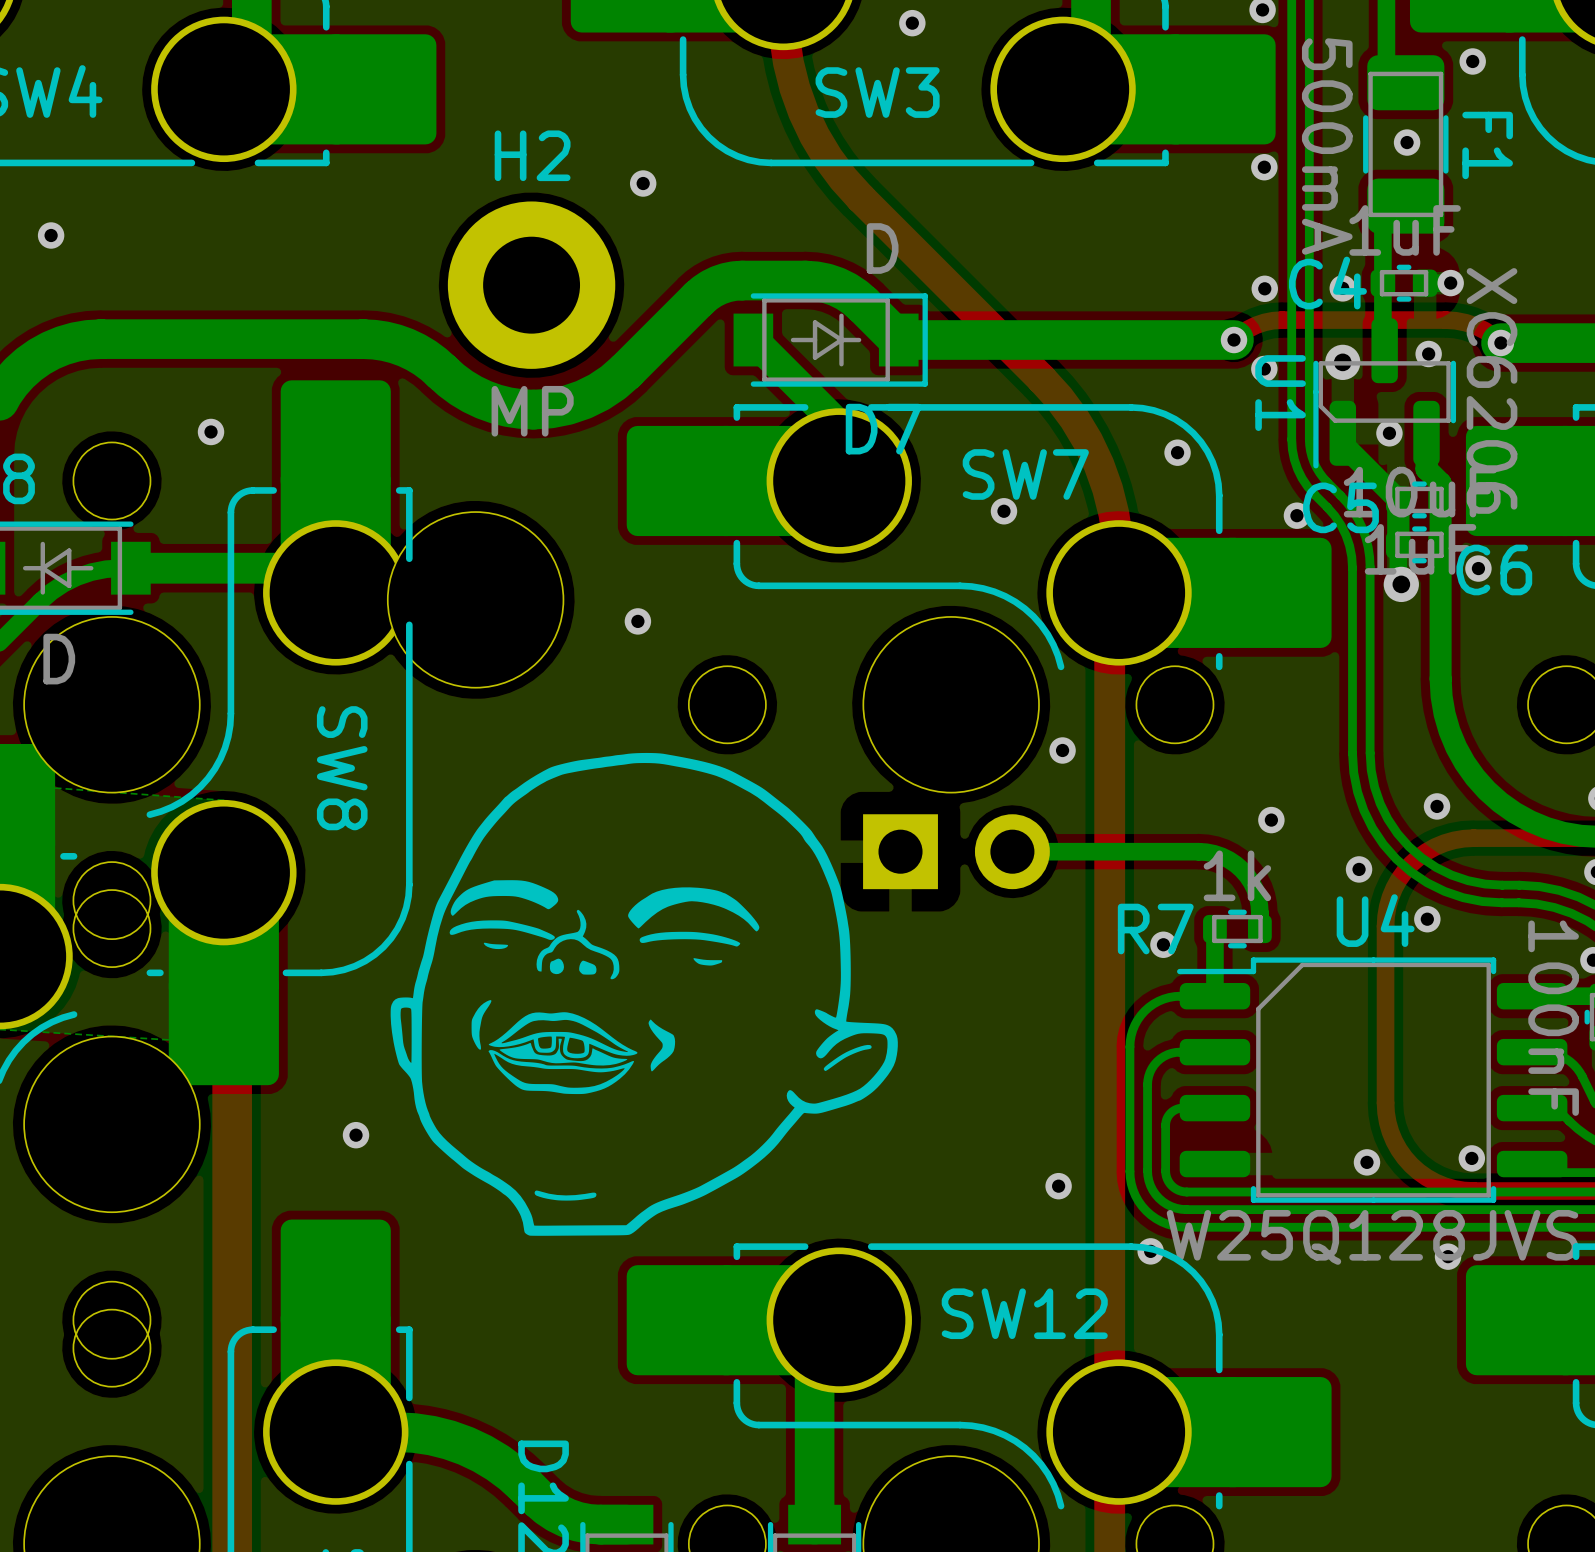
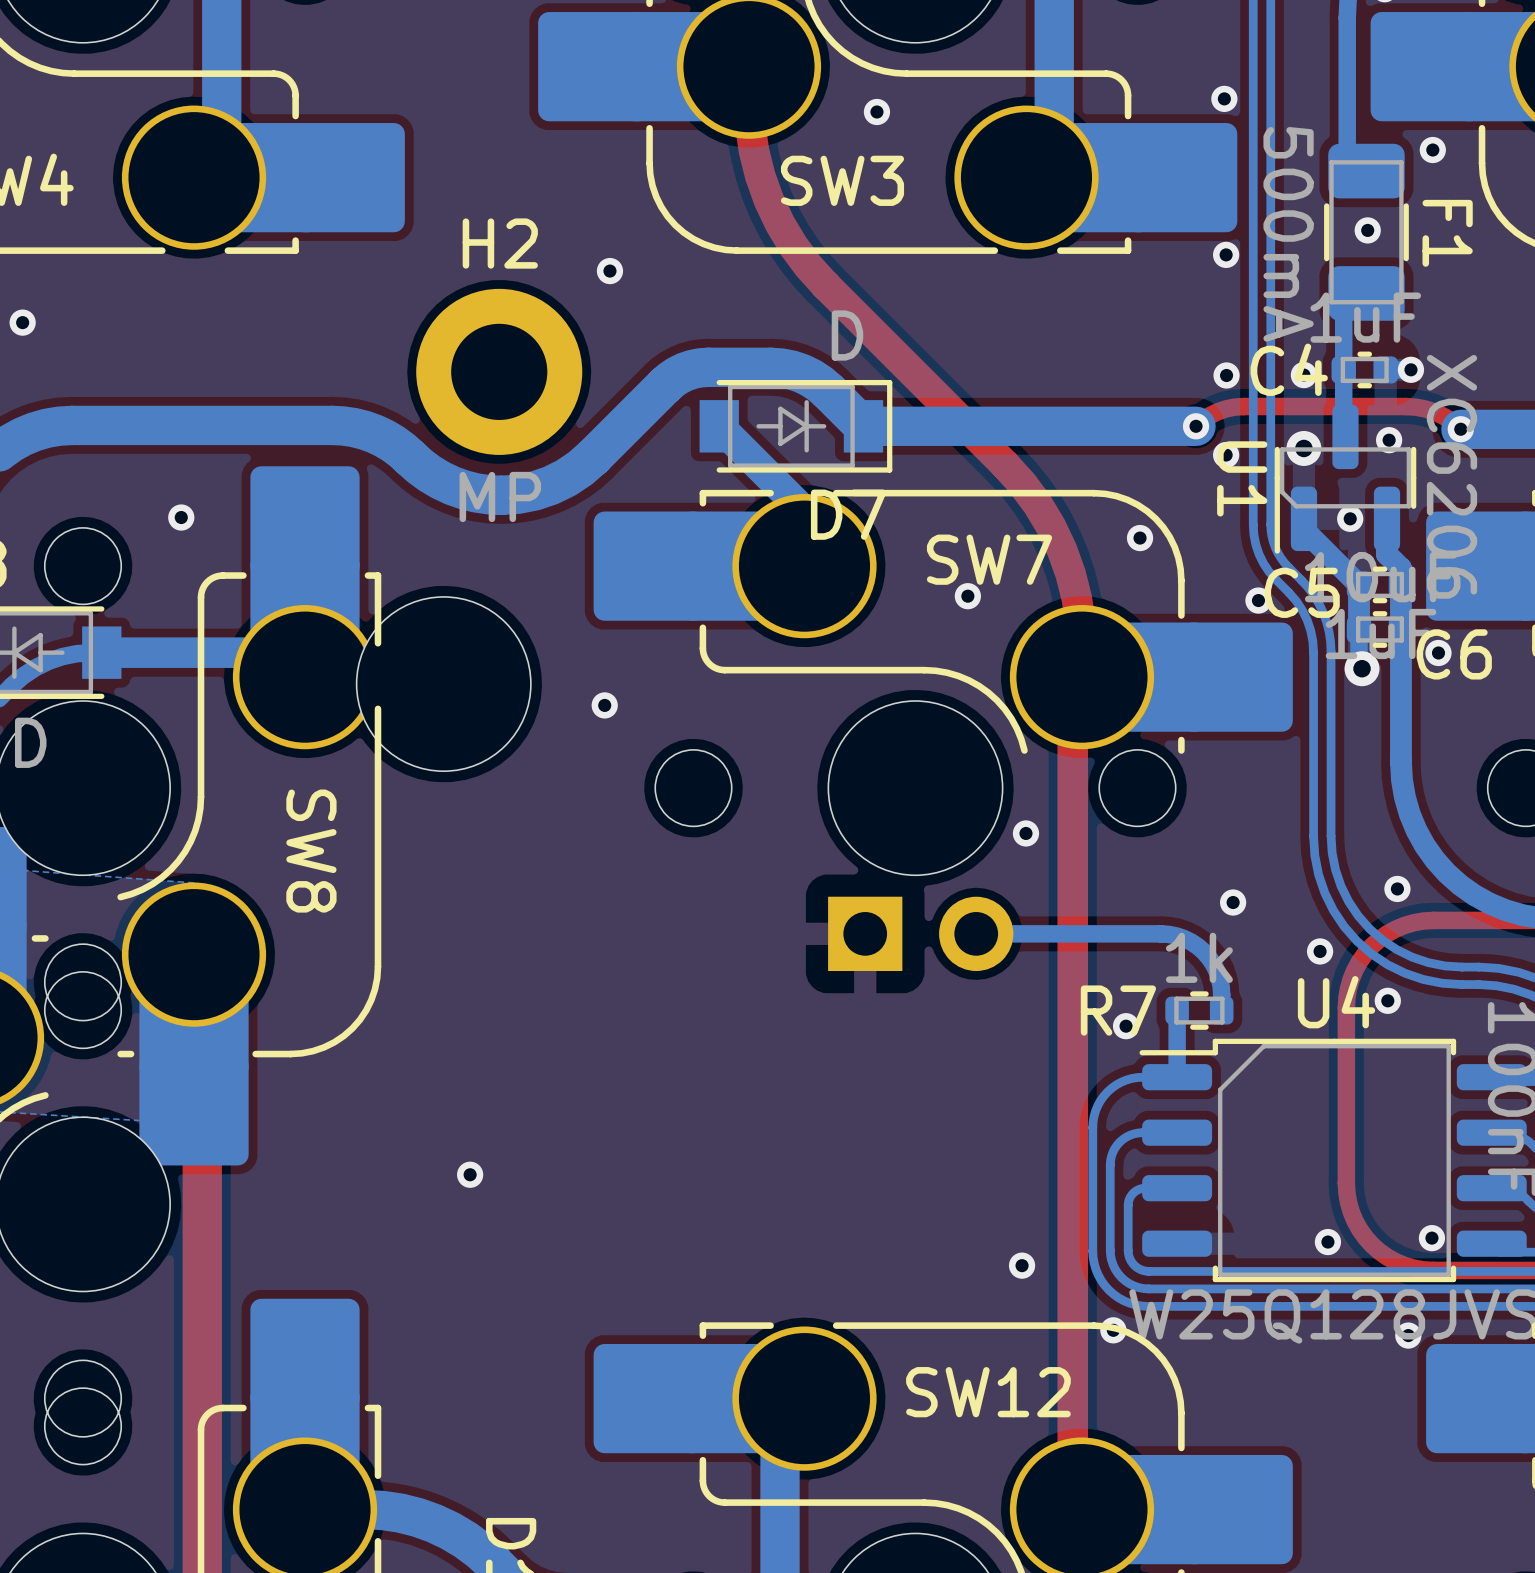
drawing: [390, 752, 898, 1236] -> none
via position: (356, 1135) -> (470, 1174)

